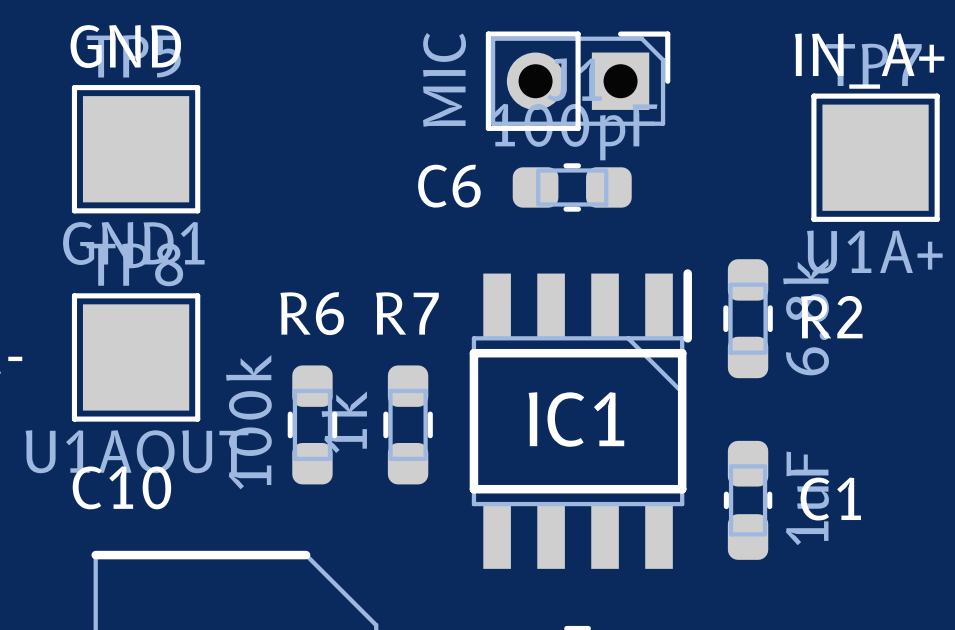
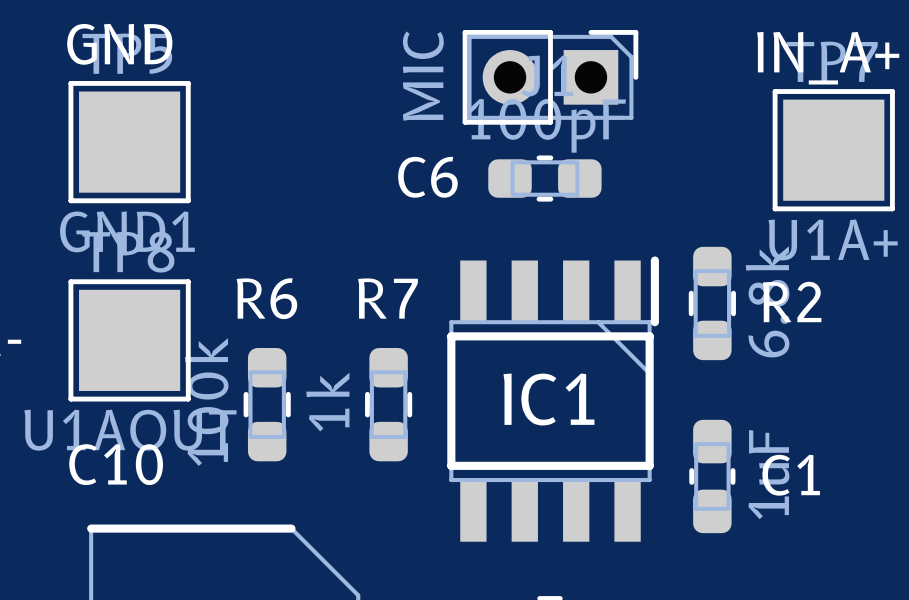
R6 position: (312, 424) -> (267, 404)

